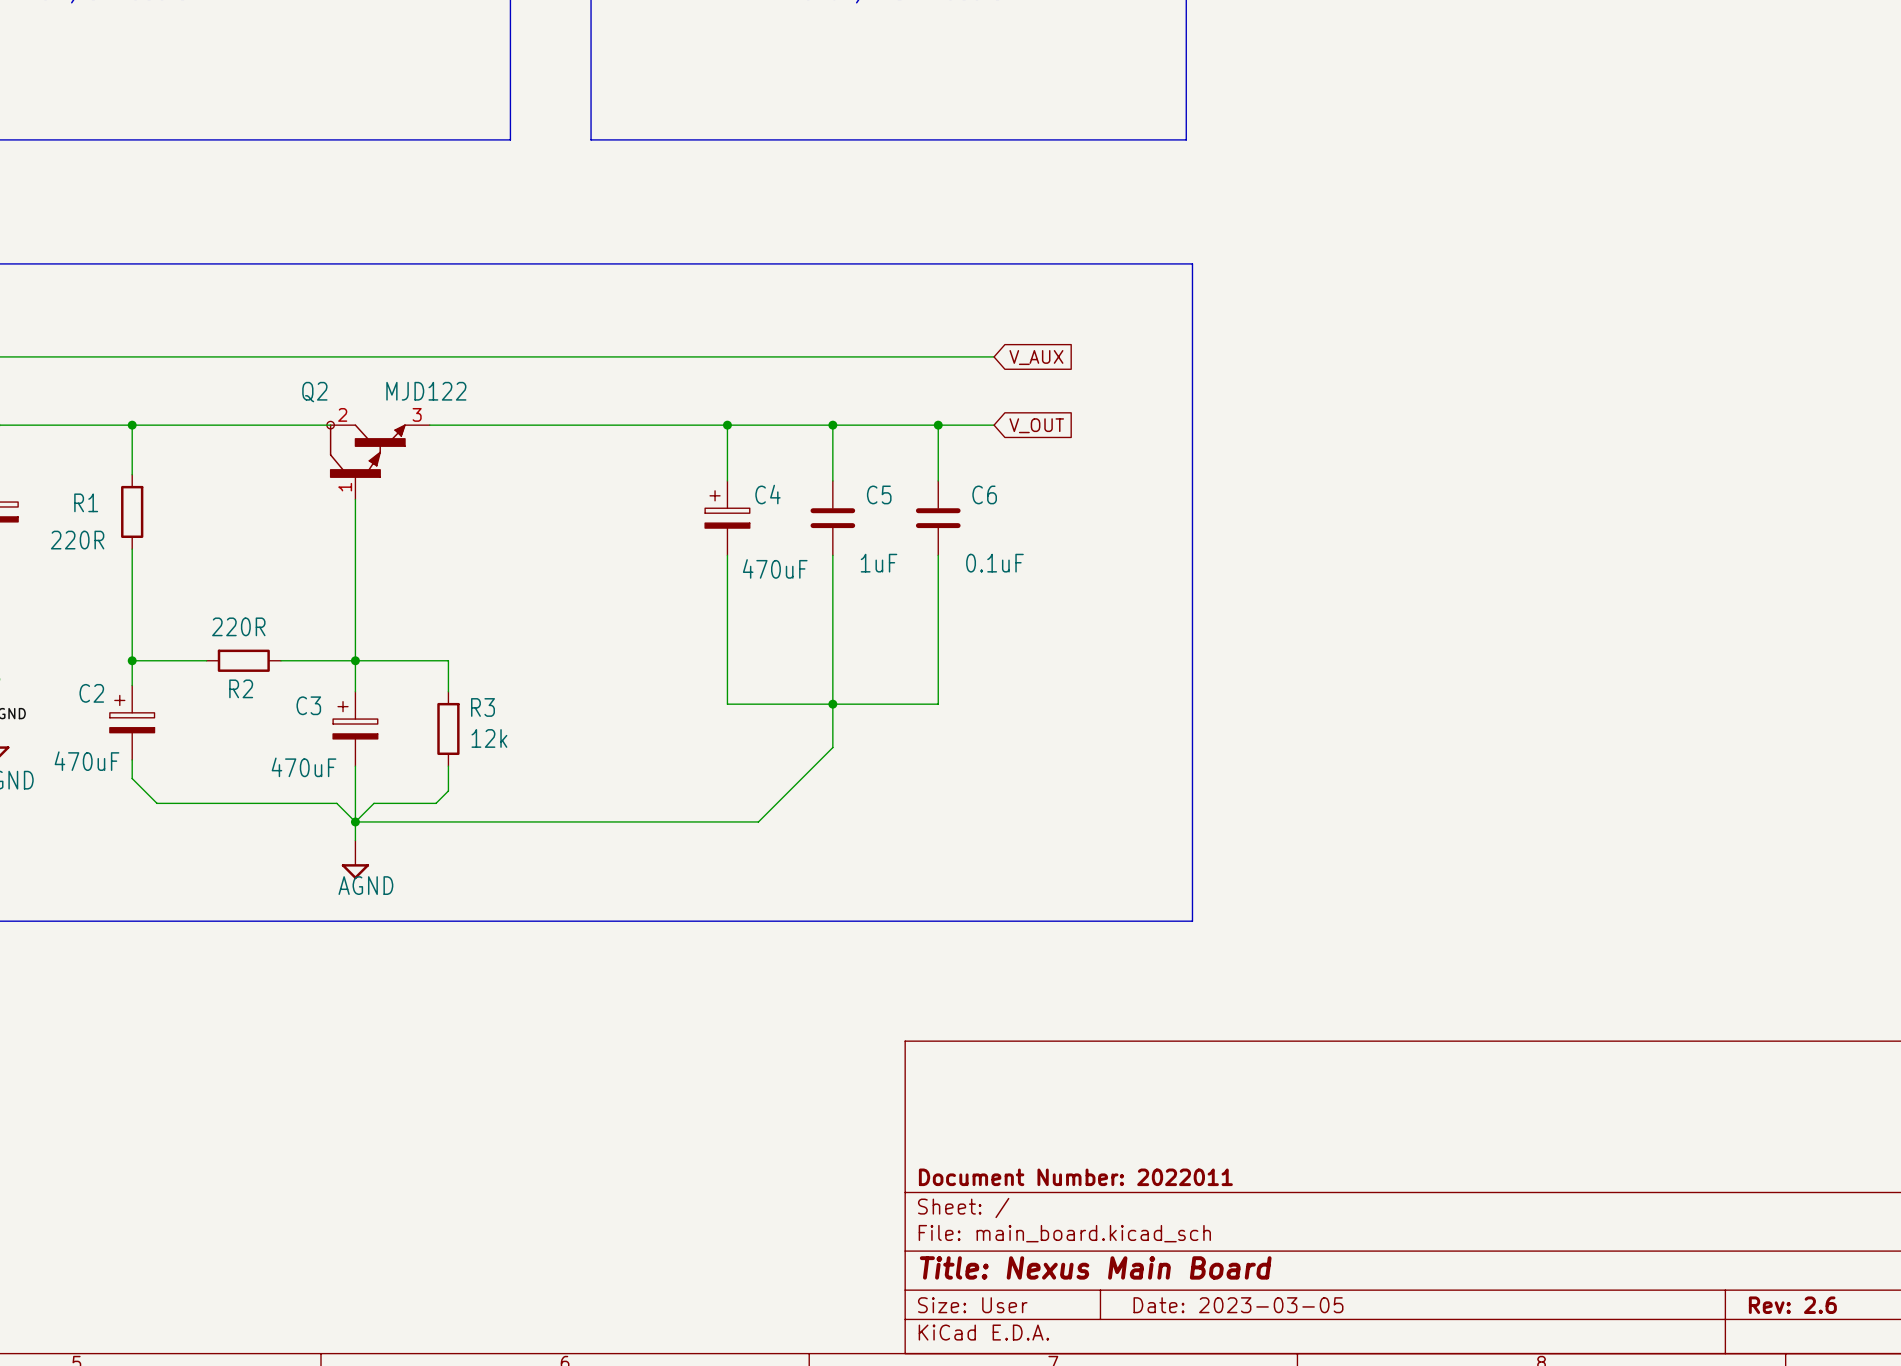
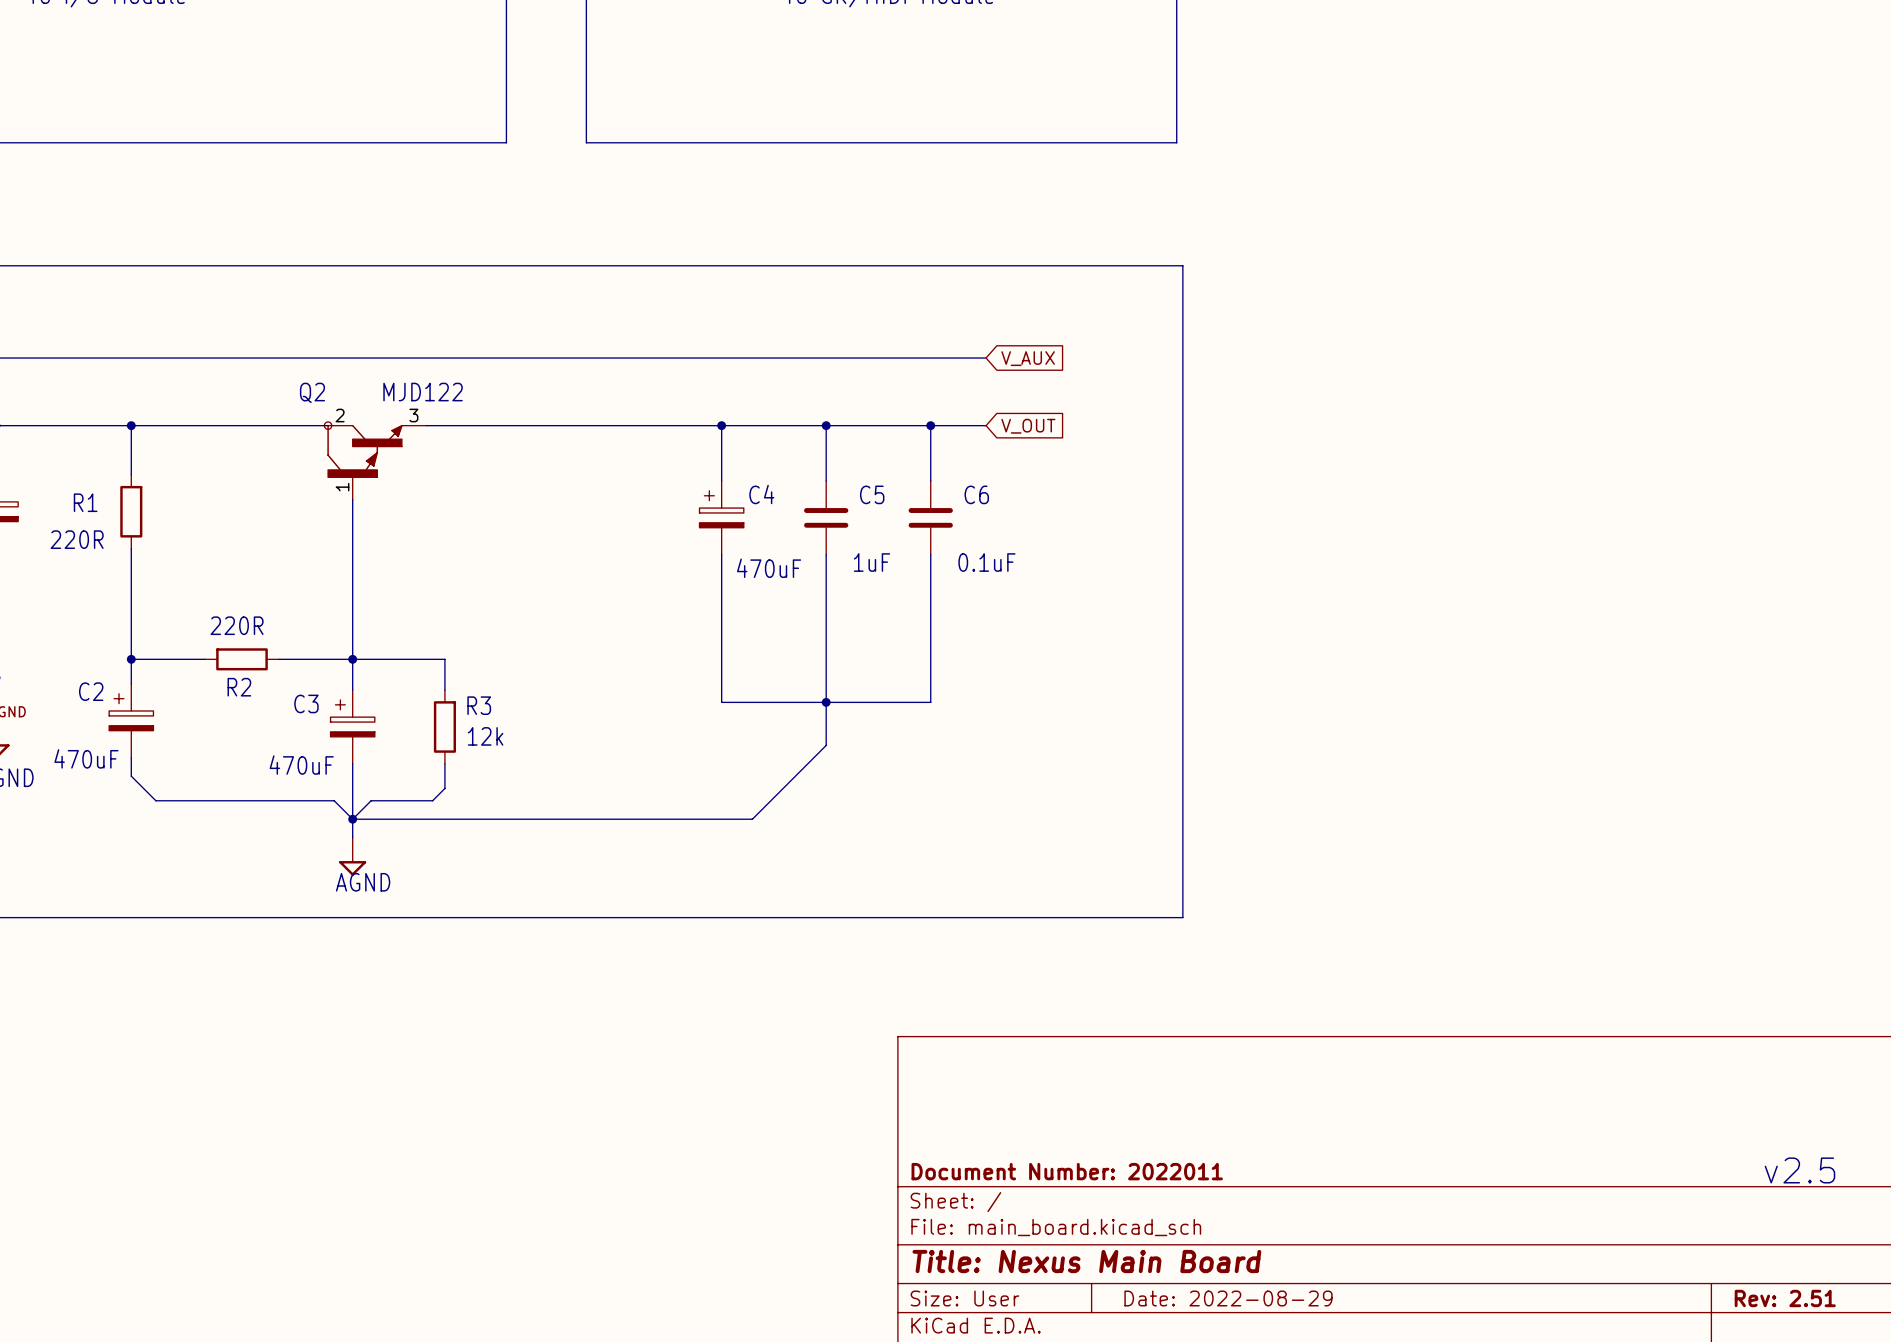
text: none -> v2.5 (1799, 1170)
title block: Date: 2023-03-05 (1238, 1305) -> Date: 2022-08-29 (1228, 1298)
title block: Rev: 2.6 (1792, 1305) -> Rev: 2.51 (1785, 1298)

